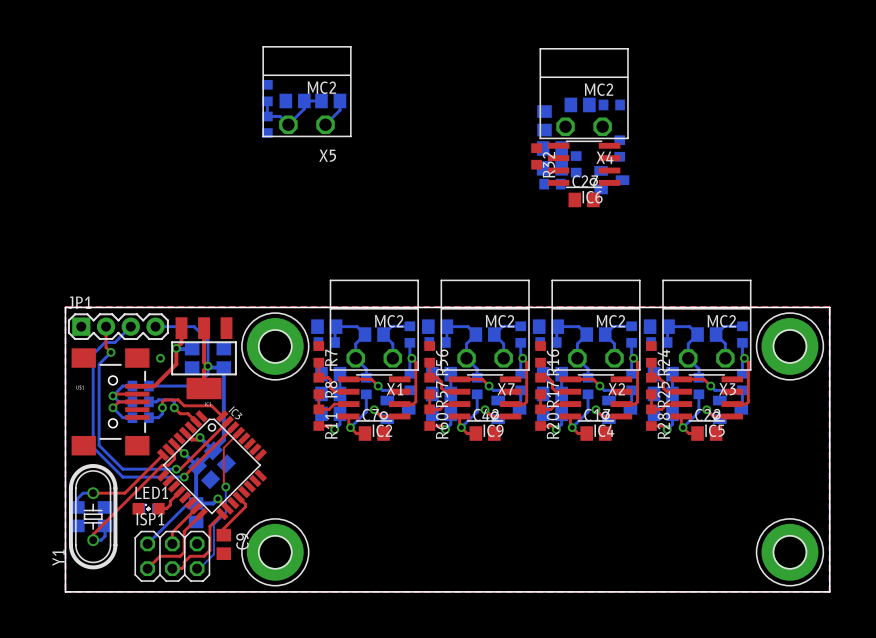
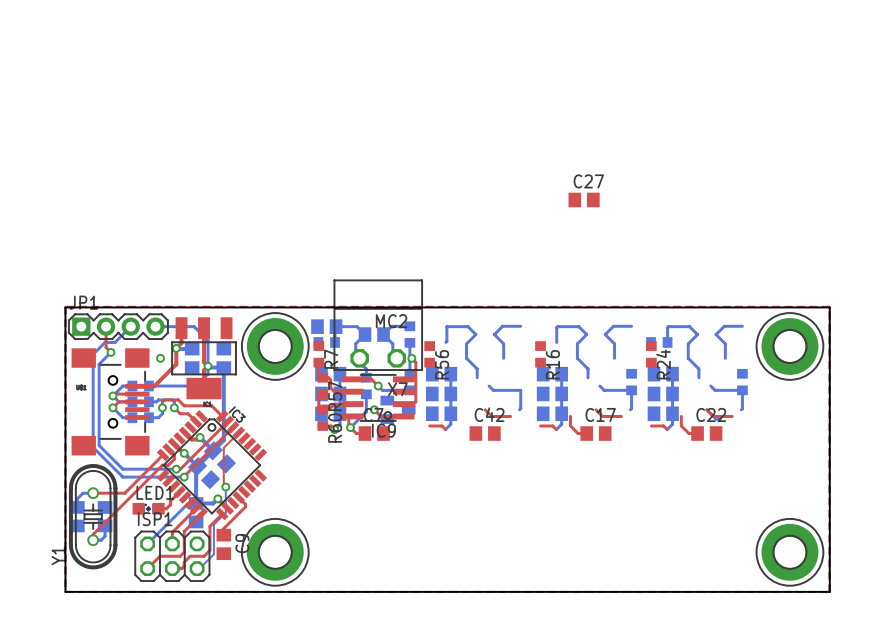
X5: MC2 (307, 91) -> none
part: (267, 93) -> none
X4: MC2 (584, 93) -> none
part: (295, 100) -> none
bottom track: (321, 100) (304, 100) (304, 108) (288, 124) (280, 116) (267, 116) (267, 101) -> none
part: (330, 100) -> none
bottom track: (339, 100) (339, 110) (325, 124) -> none
part: (580, 104) -> none
part: (611, 104) -> none
part: (544, 120) -> none
part: (267, 124) -> none
part: (552, 148) -> none
part: (619, 148) -> none
R32: (536, 156) -> none
part: (576, 164) -> none
IC6: (584, 164) -> none
part: (552, 168) -> none
part: (611, 180) -> none
part: (552, 184) -> none
X1: MC2 (374, 325) -> none
X7 position: (485, 325) -> (378, 325)
X2: MC2 (596, 325) -> none
X3: MC2 (706, 325) -> none
part: (437, 326) -> none
part: (548, 326) -> none
part: (659, 326) -> none
part: (485, 334) -> none
part: (520, 334) -> none
part: (595, 334) -> none
part: (631, 334) -> none
part: (706, 334) -> none
part: (742, 334) -> none
part: (437, 342) -> none
bottom track: (520, 342) (520, 356) (522, 358) (520, 360) (520, 373) -> none
part: (548, 342) -> none
bottom track: (631, 342) (631, 356) (633, 358) (631, 360) (631, 373) -> none
bottom track: (742, 342) (742, 356) (744, 358) (742, 360) (742, 373) -> none
top track: (522, 358) (526, 362) (526, 401) (524, 404) (510, 404) -> none
via: (522, 358) -> none
top track: (633, 358) (637, 362) (637, 401) (635, 404) (621, 404) -> none
via: (633, 358) -> none
top track: (744, 358) (748, 362) (748, 401) (746, 404) (732, 404) -> none
via: (744, 358) -> none
top track: (429, 362) (429, 377) (437, 377) (441, 382) (441, 388) (445, 391) (459, 391) -> none
top track: (651, 362) (651, 377) (658, 377) (663, 382) (663, 388) (666, 391) (681, 391) -> none
top track: (540, 377) (548, 377) (552, 382) (552, 388) (556, 391) (570, 391) -> none
top track: (459, 379) (482, 379) (489, 386) -> none
top track: (570, 379) (593, 379) (599, 386) -> none
top track: (681, 379) (704, 379) (710, 386) -> none
part: (520, 382) -> none
R8: (318, 386) -> none
R57 position: (429, 386) -> (322, 386)
part: (477, 386) -> none
via: (489, 386) -> none
R17: (540, 386) -> none
part: (588, 386) -> none
via: (599, 386) -> none
R25: (651, 386) -> none
part: (698, 386) -> none
via: (710, 386) -> none
top track: (429, 394) (429, 409) (439, 409) (445, 404) (459, 404) -> none
bottom track: (477, 394) (477, 411) (461, 427) -> none
top track: (540, 394) (540, 409) (550, 409) (556, 404) (570, 404) -> none
bottom track: (588, 394) (588, 411) (572, 427) -> none
top track: (651, 394) (651, 409) (661, 409) (666, 404) (681, 404) -> none
bottom track: (698, 394) (698, 411) (683, 427) -> none
IC2: (374, 397) -> none
IC9 position: (485, 397) -> (378, 397)
IC4: (595, 397) -> none
IC5: (706, 397) -> none
via: (485, 409) -> none
part: (508, 409) -> none
via: (595, 409) -> none
part: (619, 409) -> none
via: (706, 409) -> none
part: (730, 409) -> none
top track: (459, 416) (459, 425) (467, 433) (475, 433) -> none
R11: (318, 417) -> none
R60 position: (429, 417) -> (322, 417)
R20: (540, 417) -> none
R28: (651, 417) -> none
via: (461, 427) -> none
via: (572, 427) -> none
via: (683, 427) -> none
via: (445, 429) -> none
via: (556, 429) -> none
via: (667, 429) -> none

